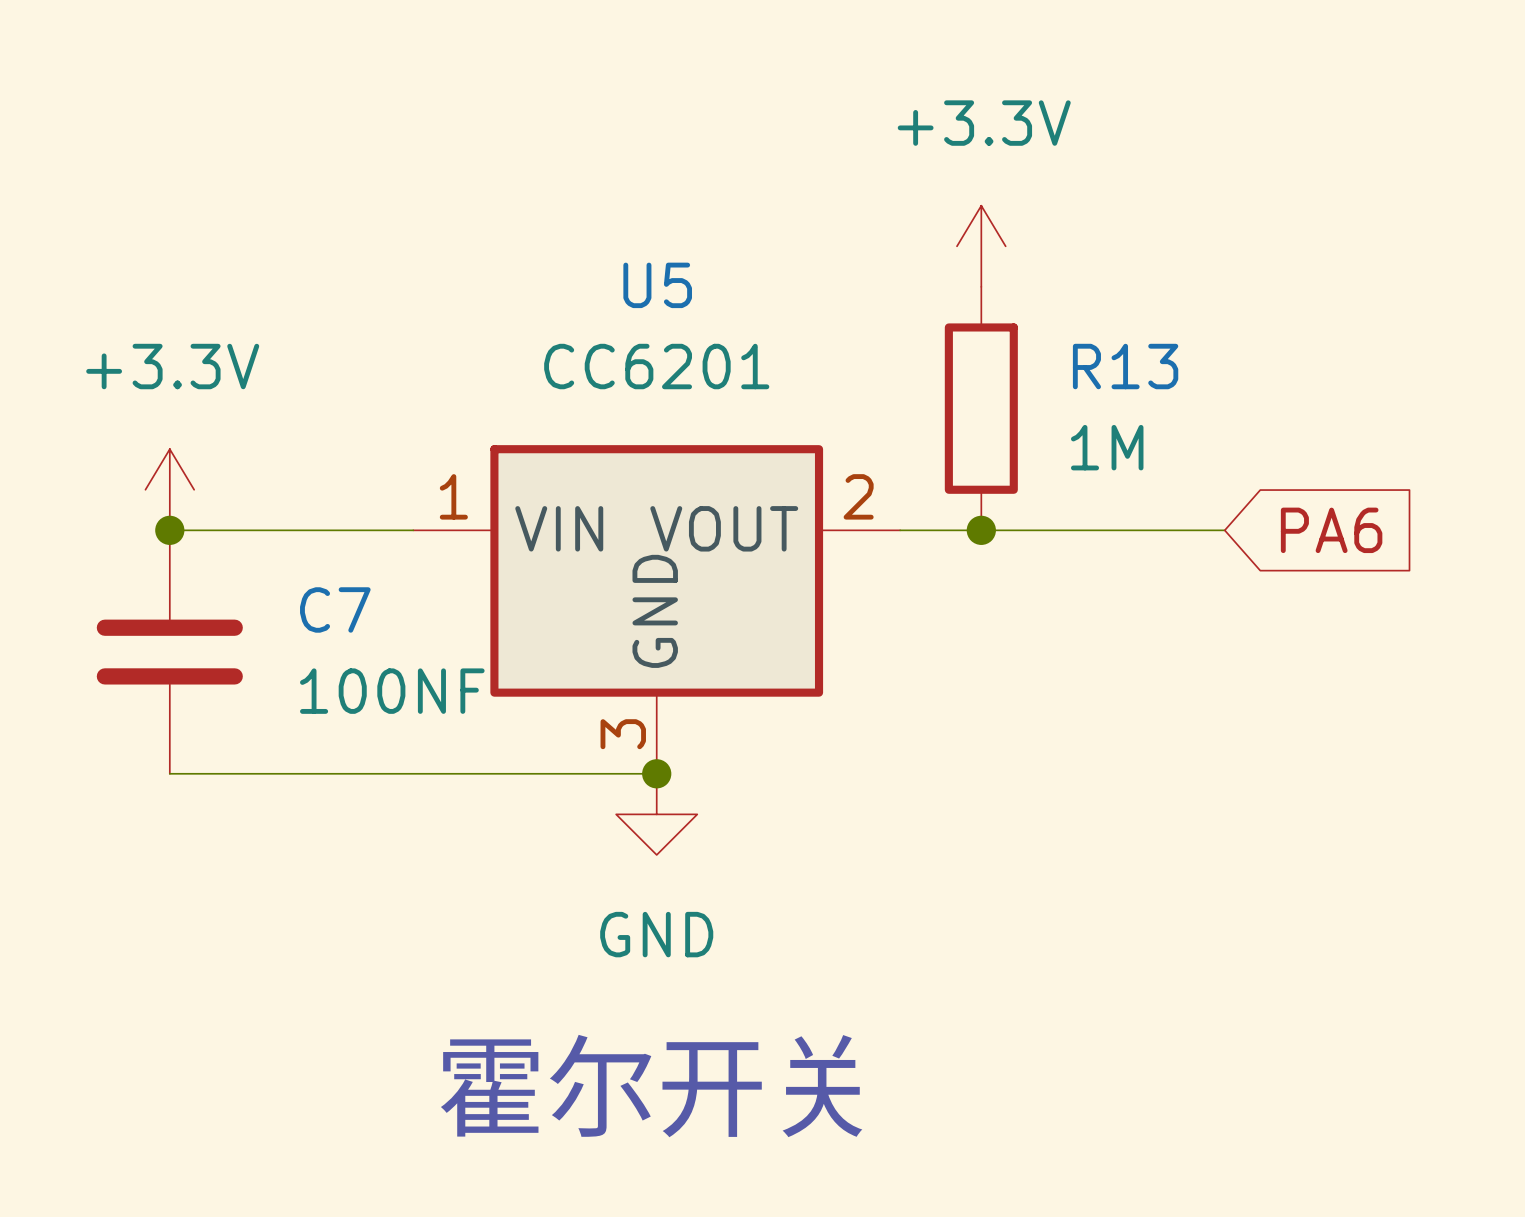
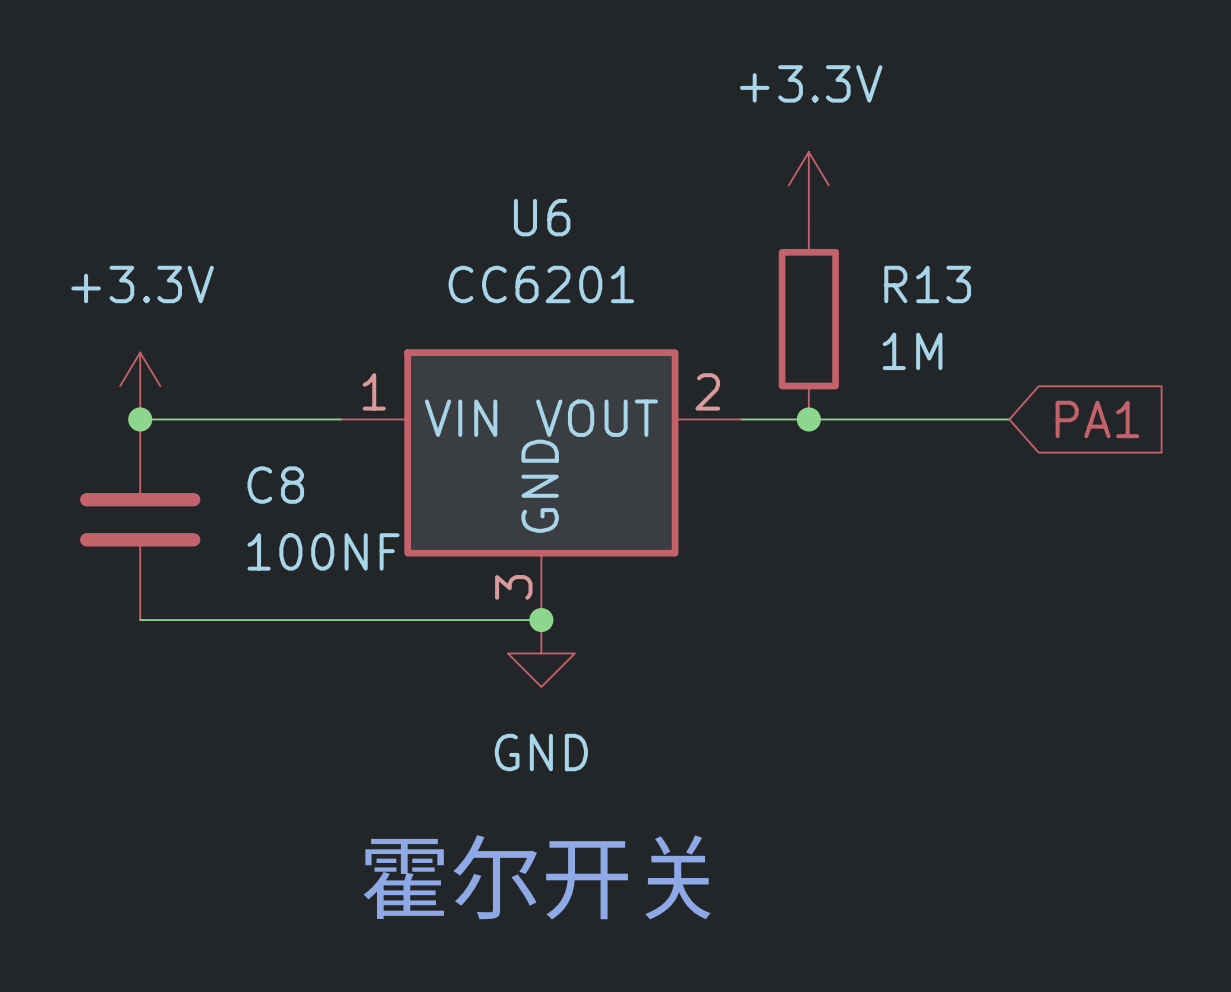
U5 name: U5 (657, 285) -> U6 (542, 217)
global label: PA6 (1331, 530) -> PA1 (1097, 419)
C7 name: C7 (335, 609) -> C8 (275, 485)

